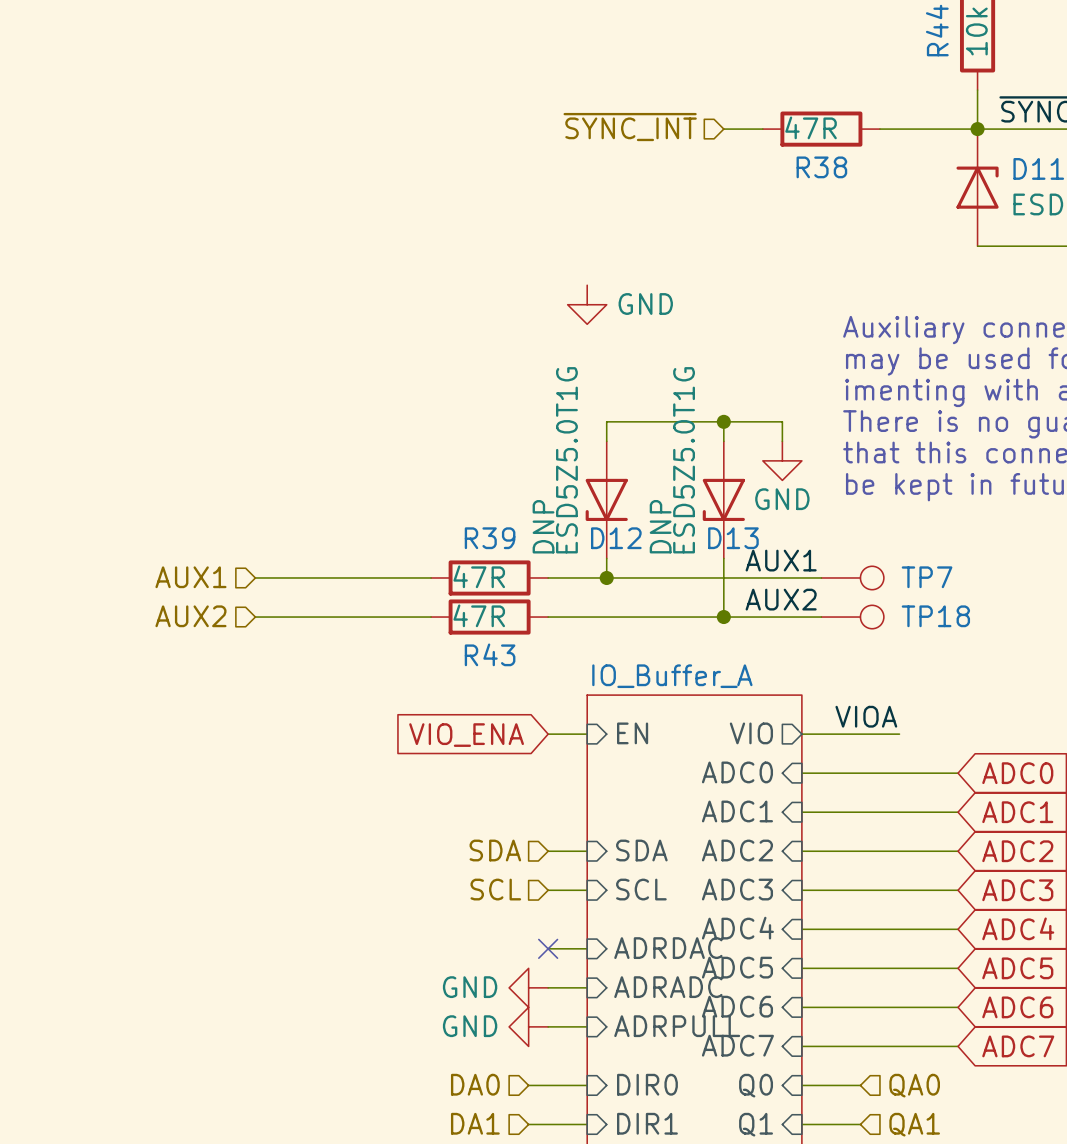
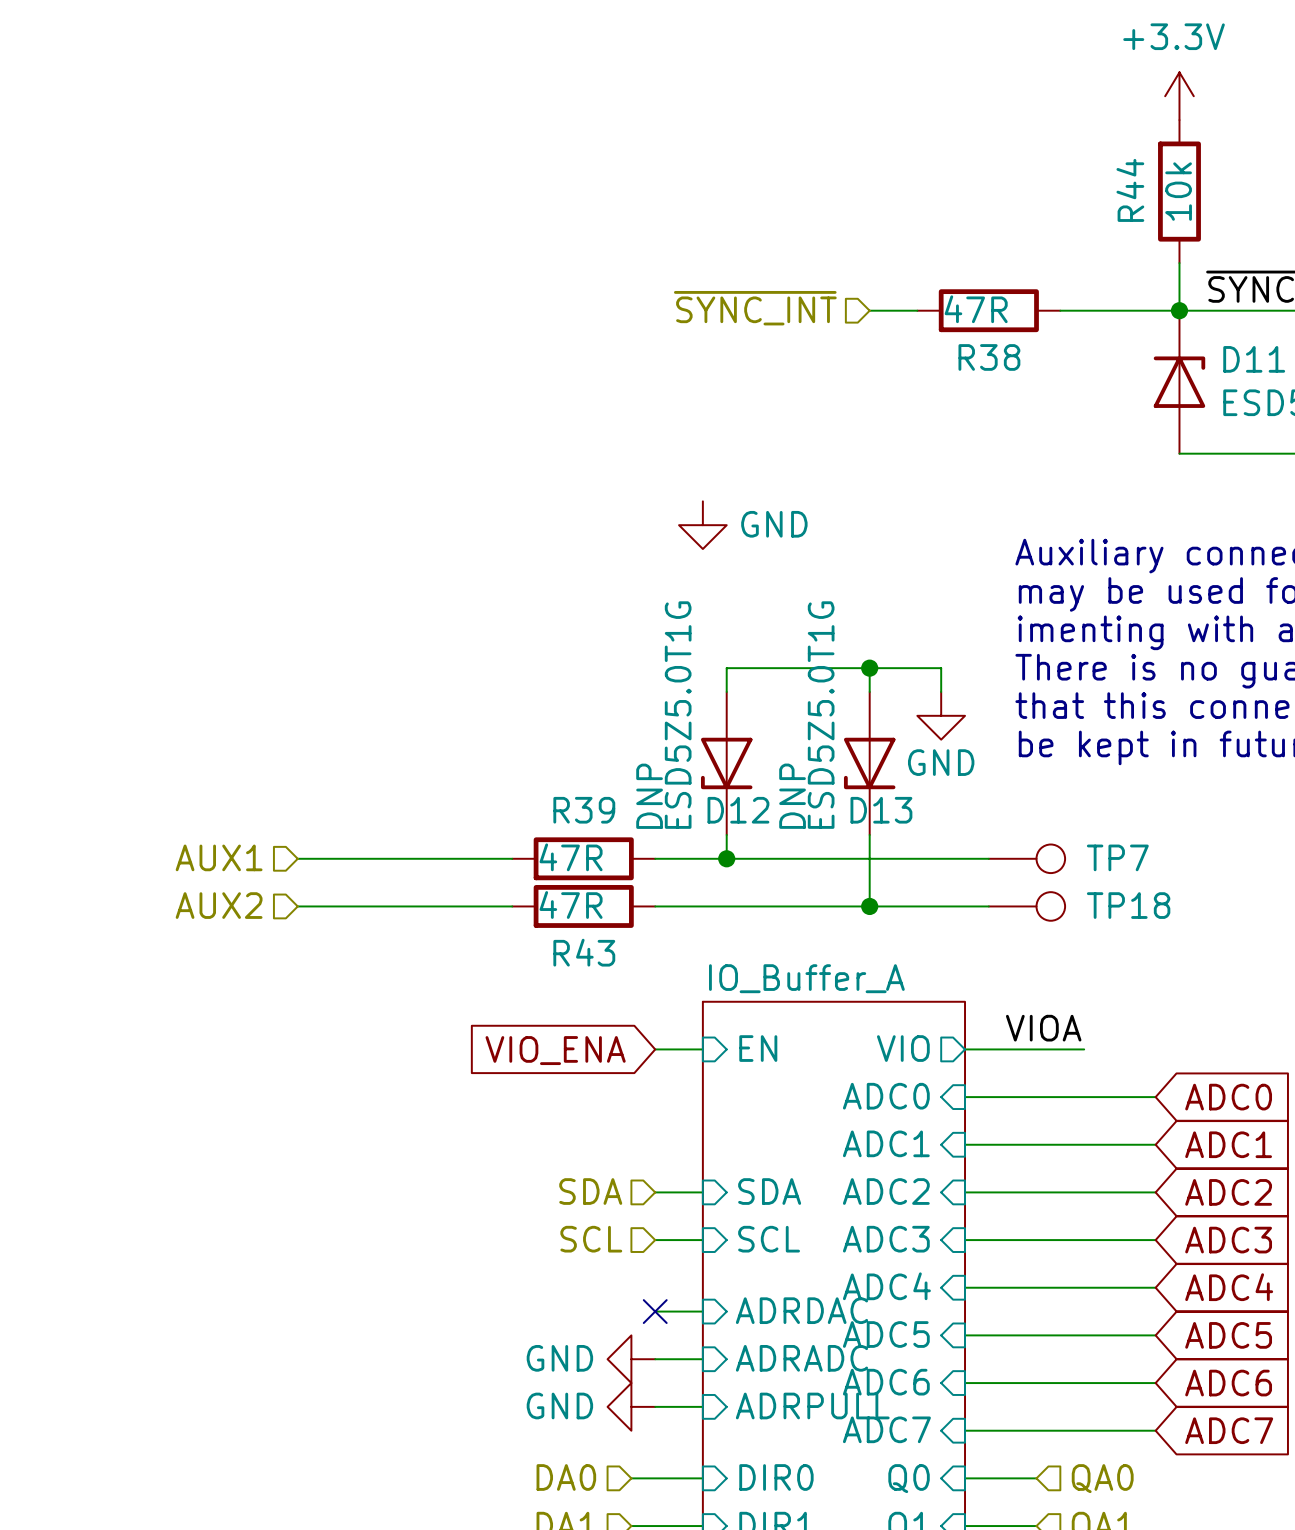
label: AUX1 (781, 560) -> none
label: AUX2 (781, 599) -> none

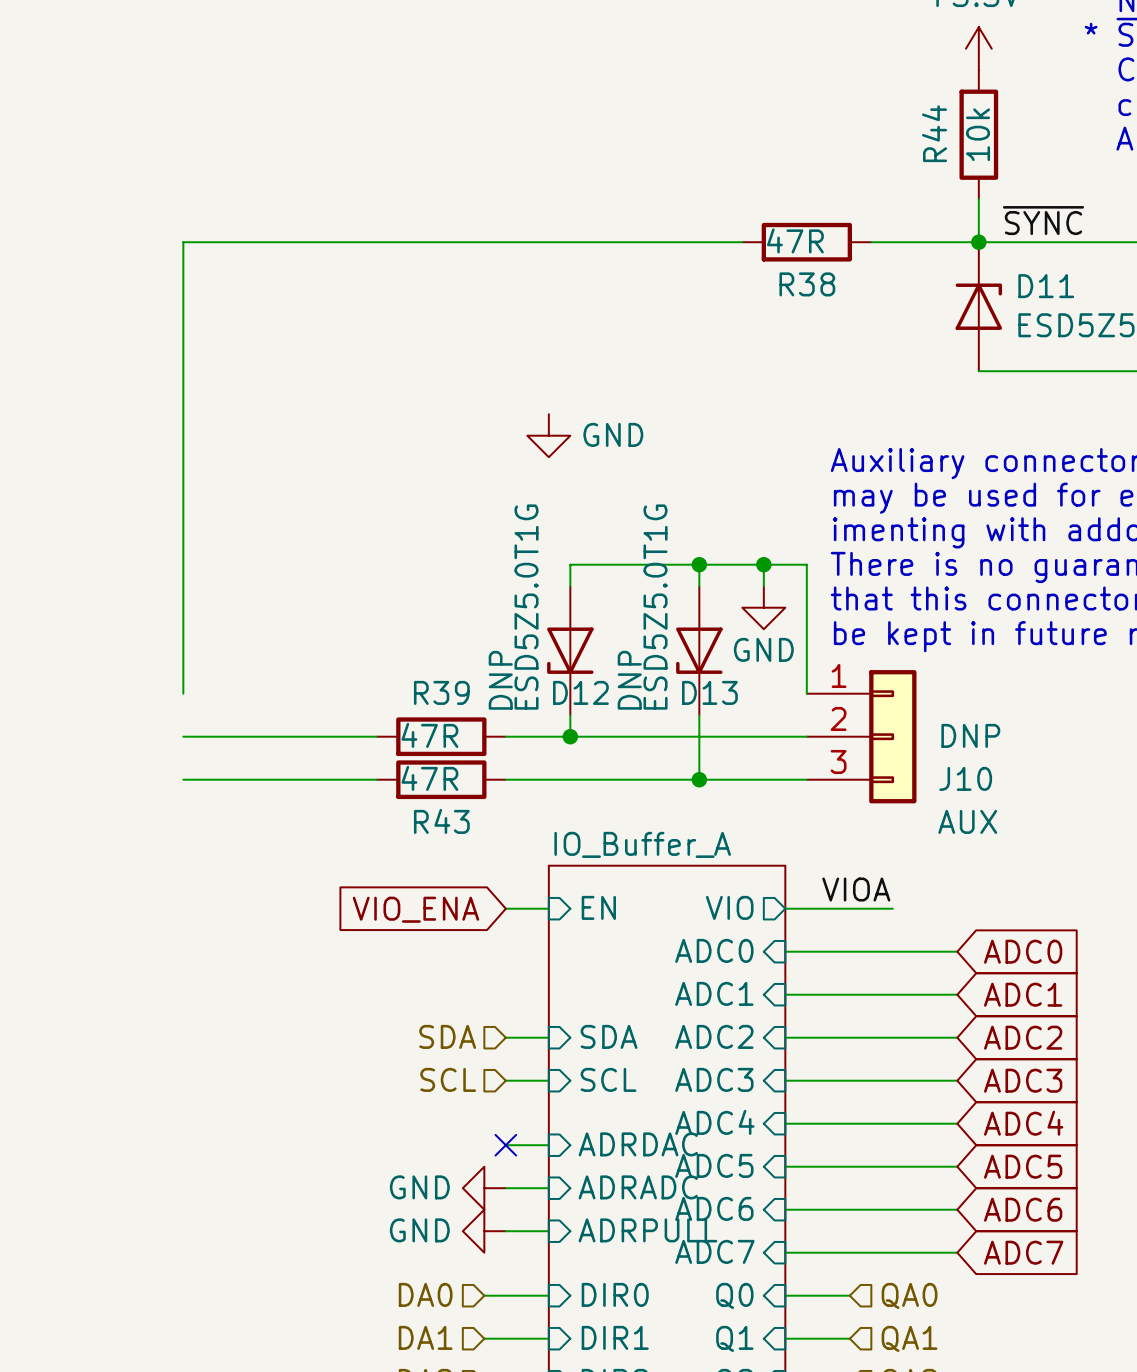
hierarchical label: ~{SYNC_INT} (755, 308) -> none
wire: none -> (699, 242) (183, 242) (183, 693)
wire: none -> (763, 564) (806, 564) (806, 693)
junction: none -> (763, 564)
hierarchical label: AUX1 (219, 857) -> none
TP7: (1026, 858) -> none
J10: none -> AUX (861, 736)
hierarchical label: AUX2 (219, 905) -> none
TP18: (1026, 906) -> none

